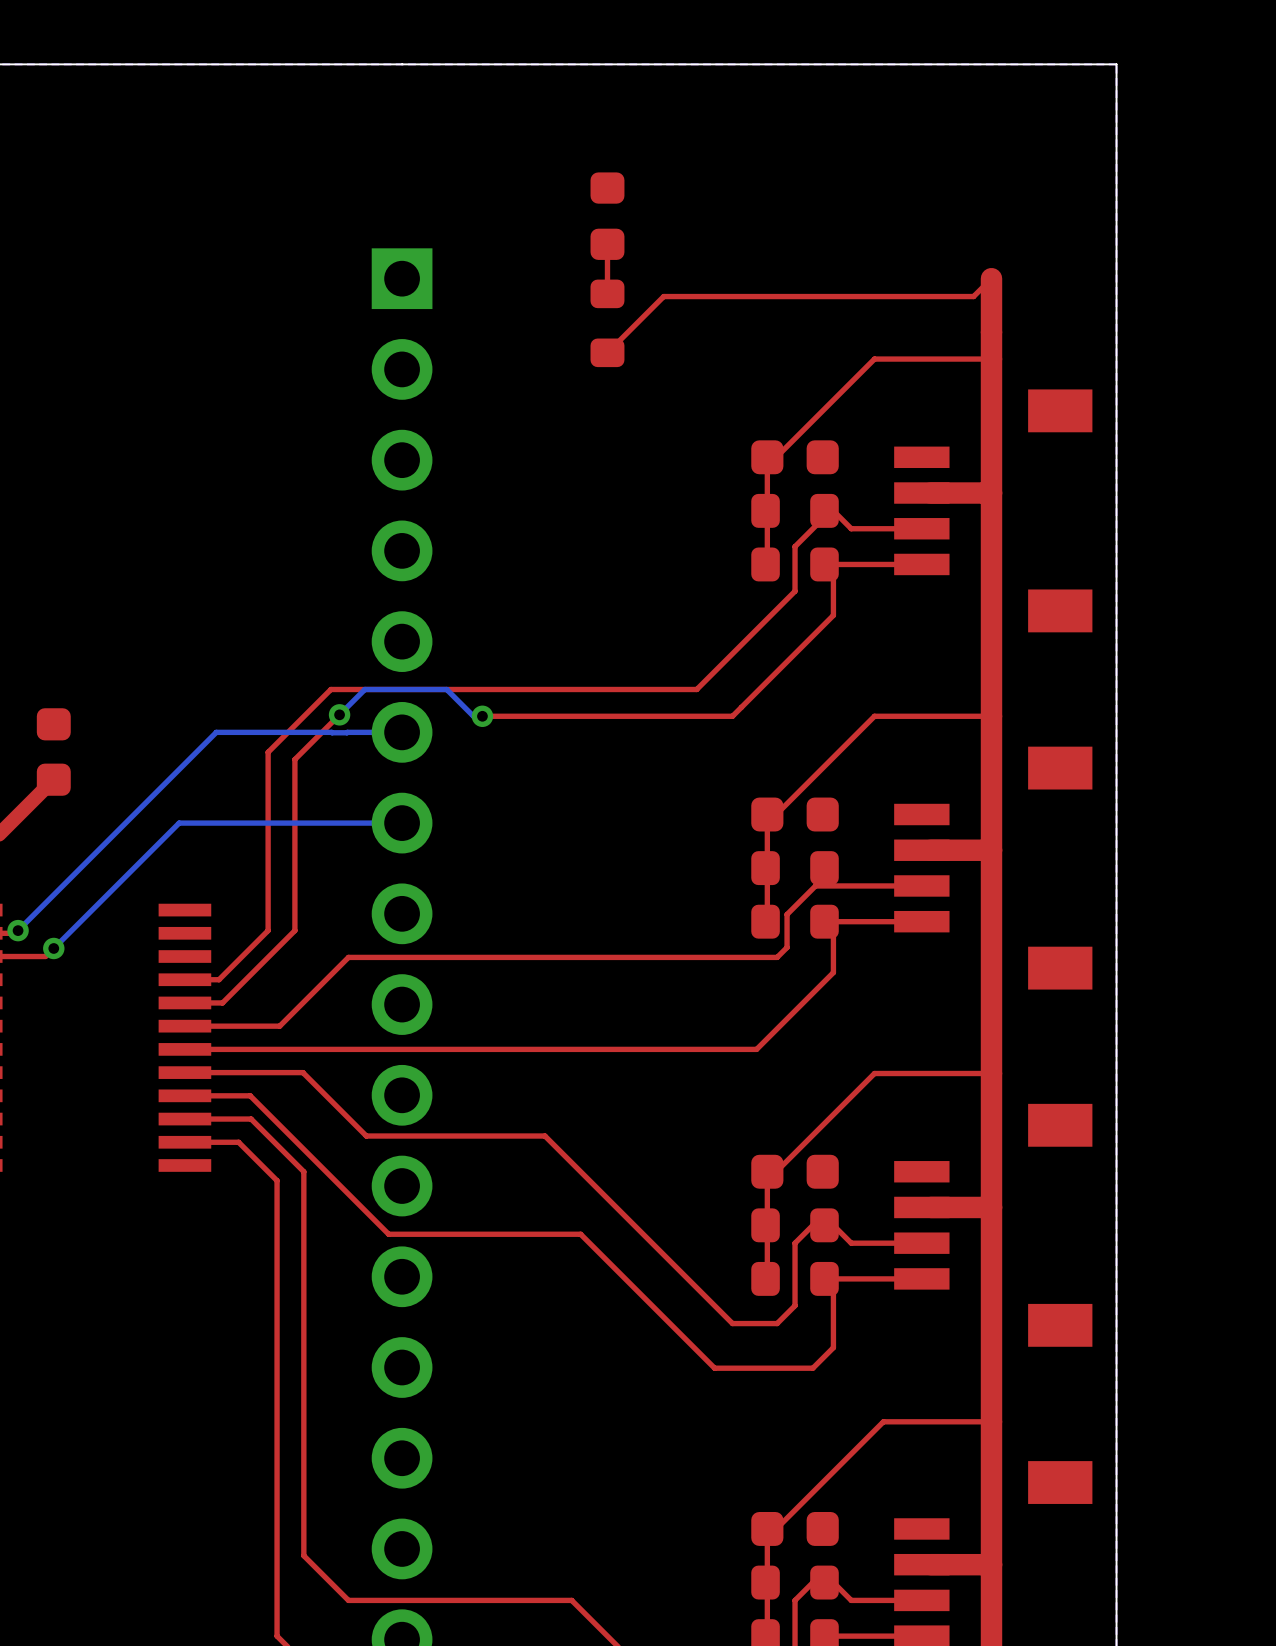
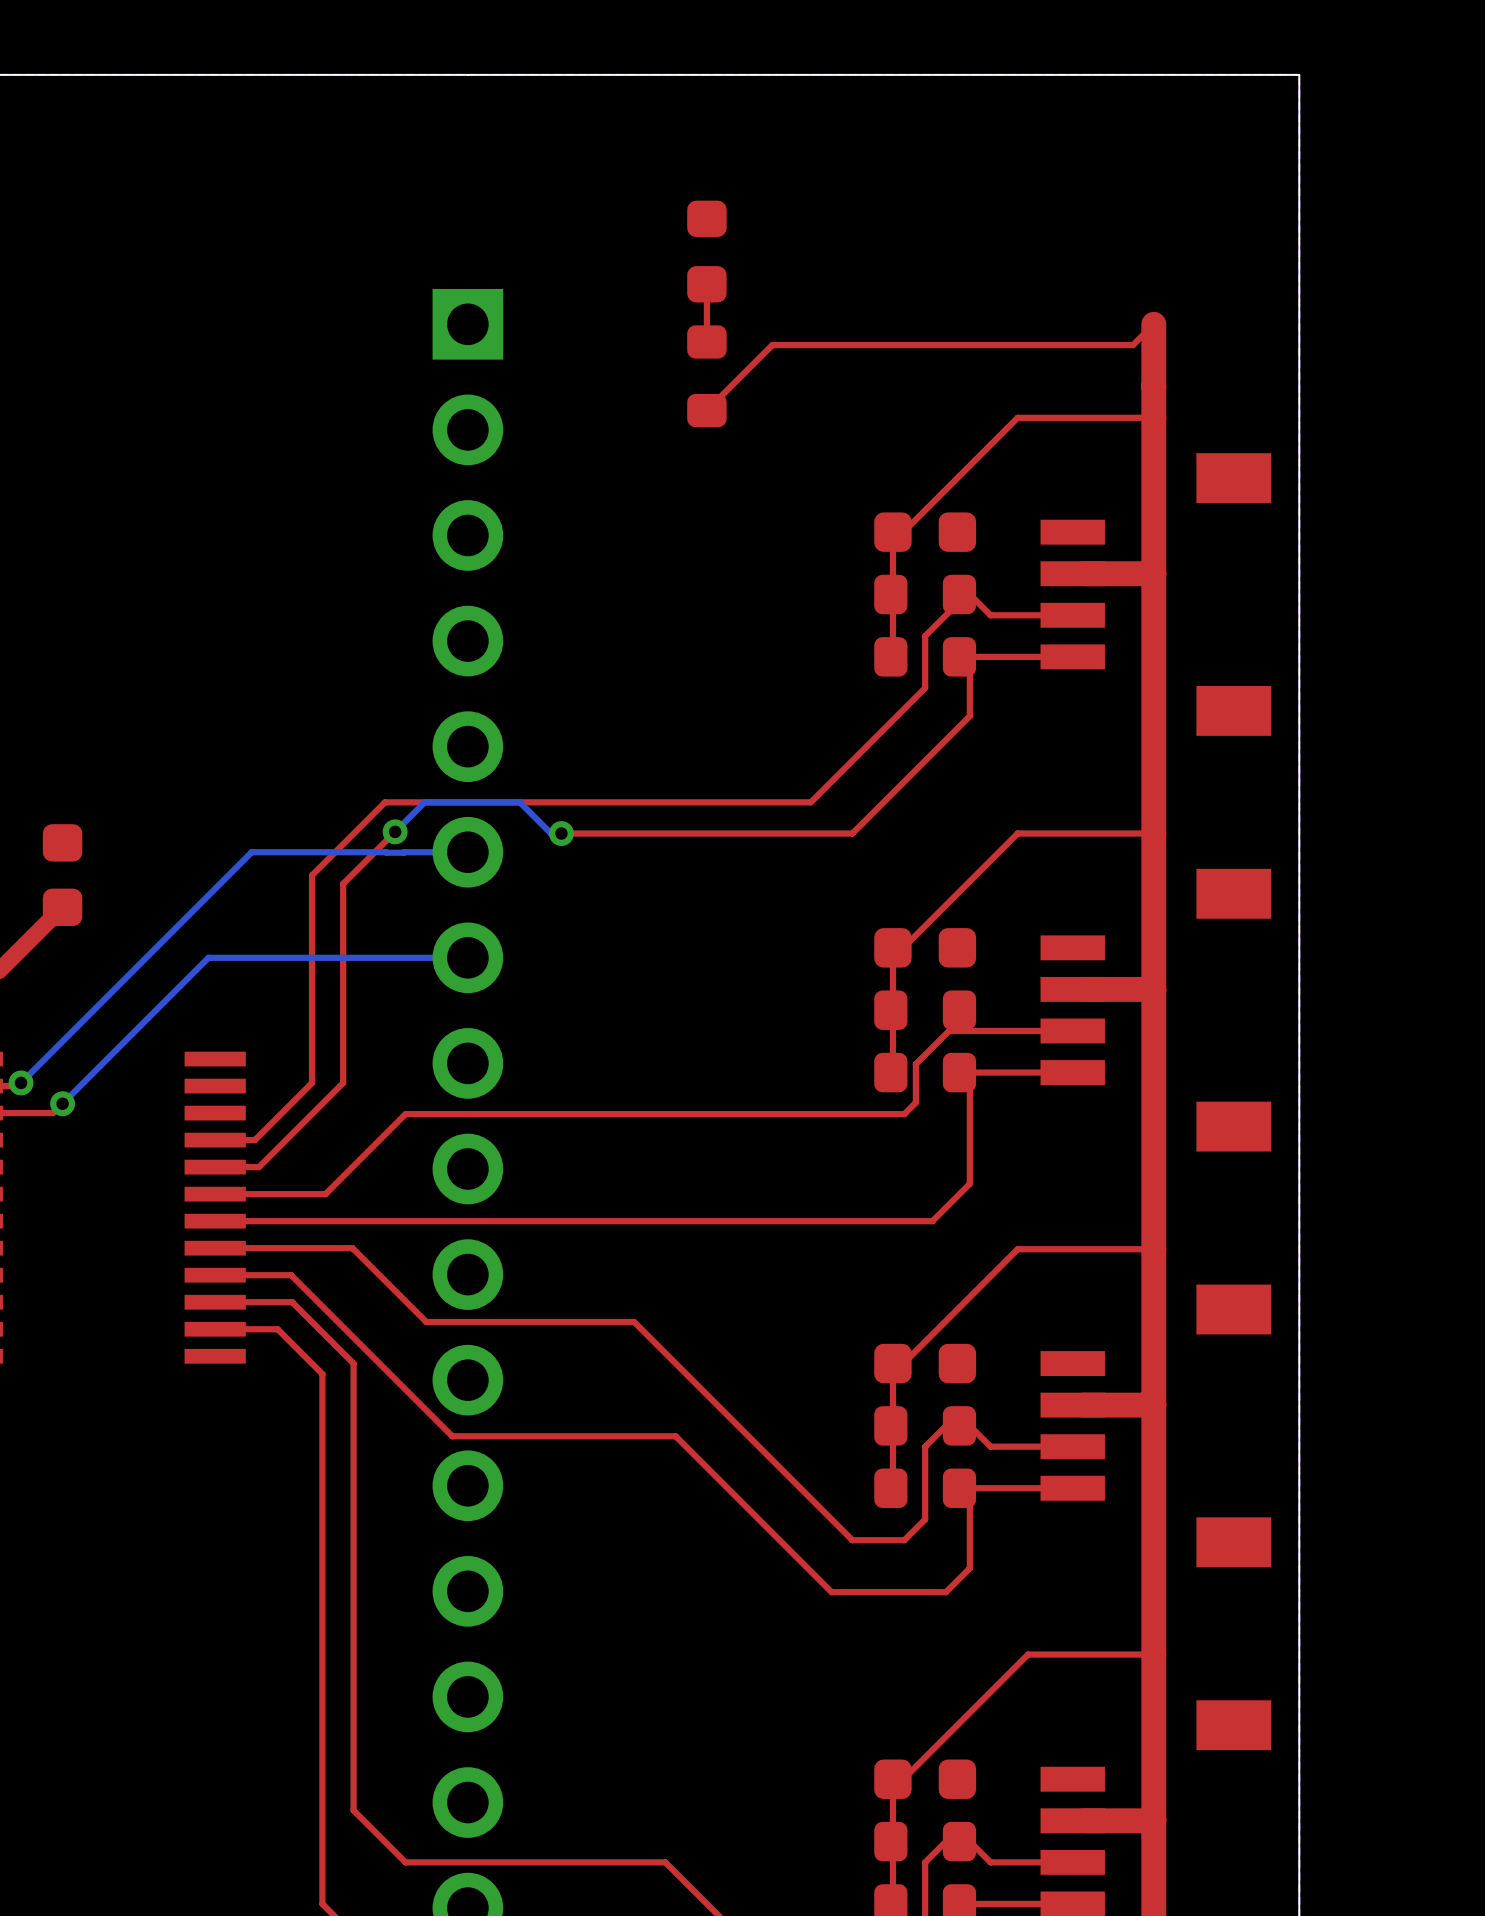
top track: (833, 972) (756, 1049) -> (969, 1131) (969, 1183) (932, 1221) (880, 1221)

